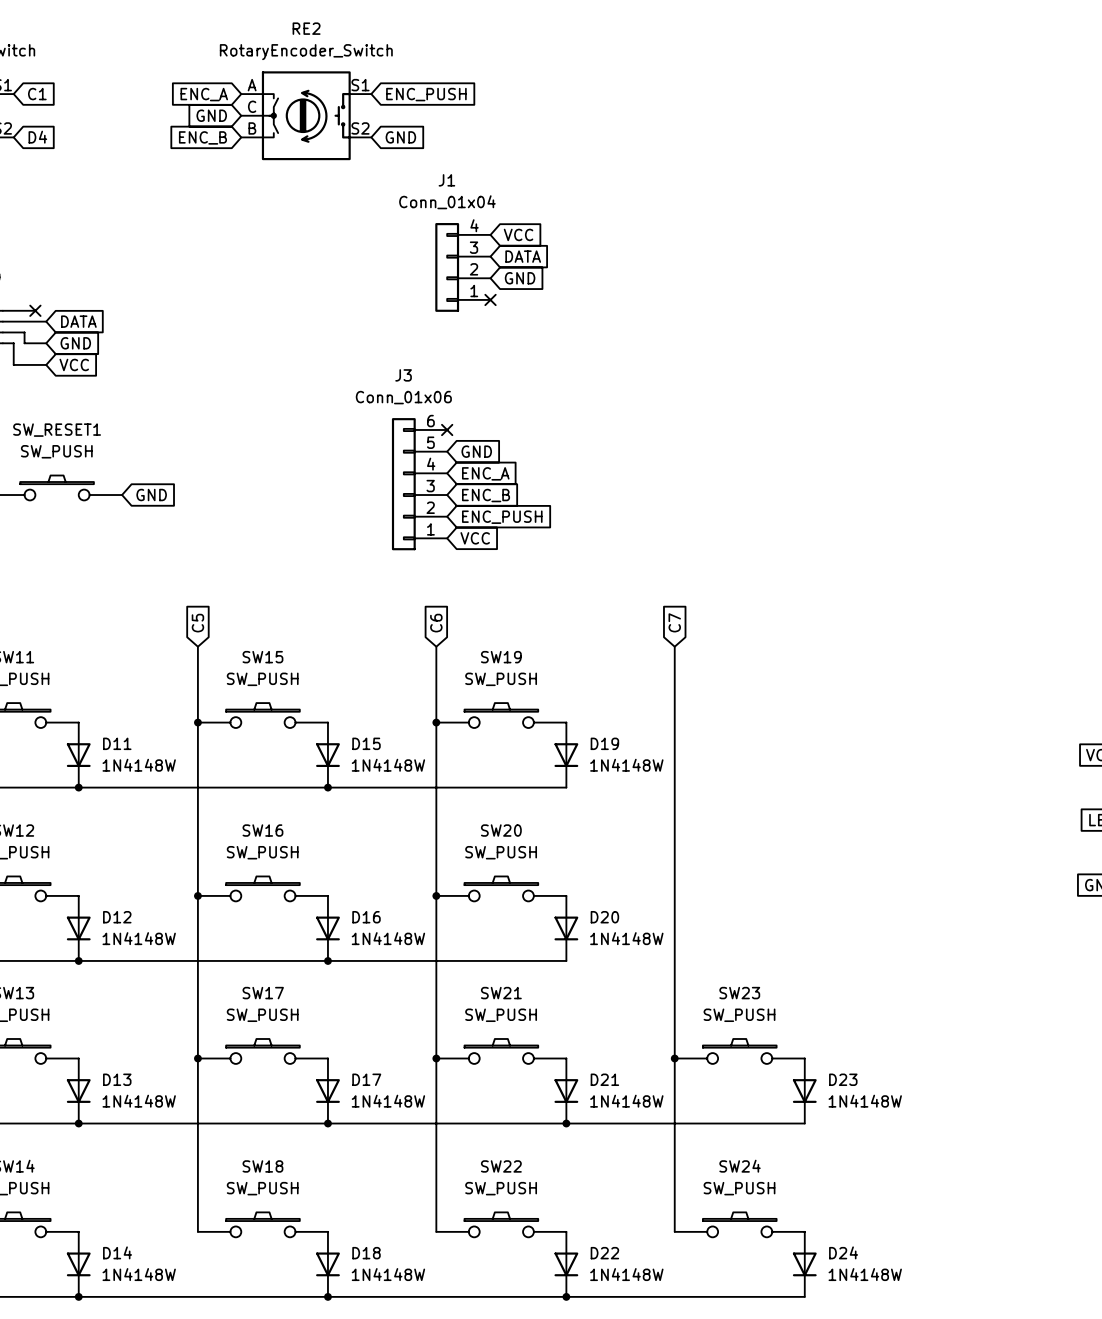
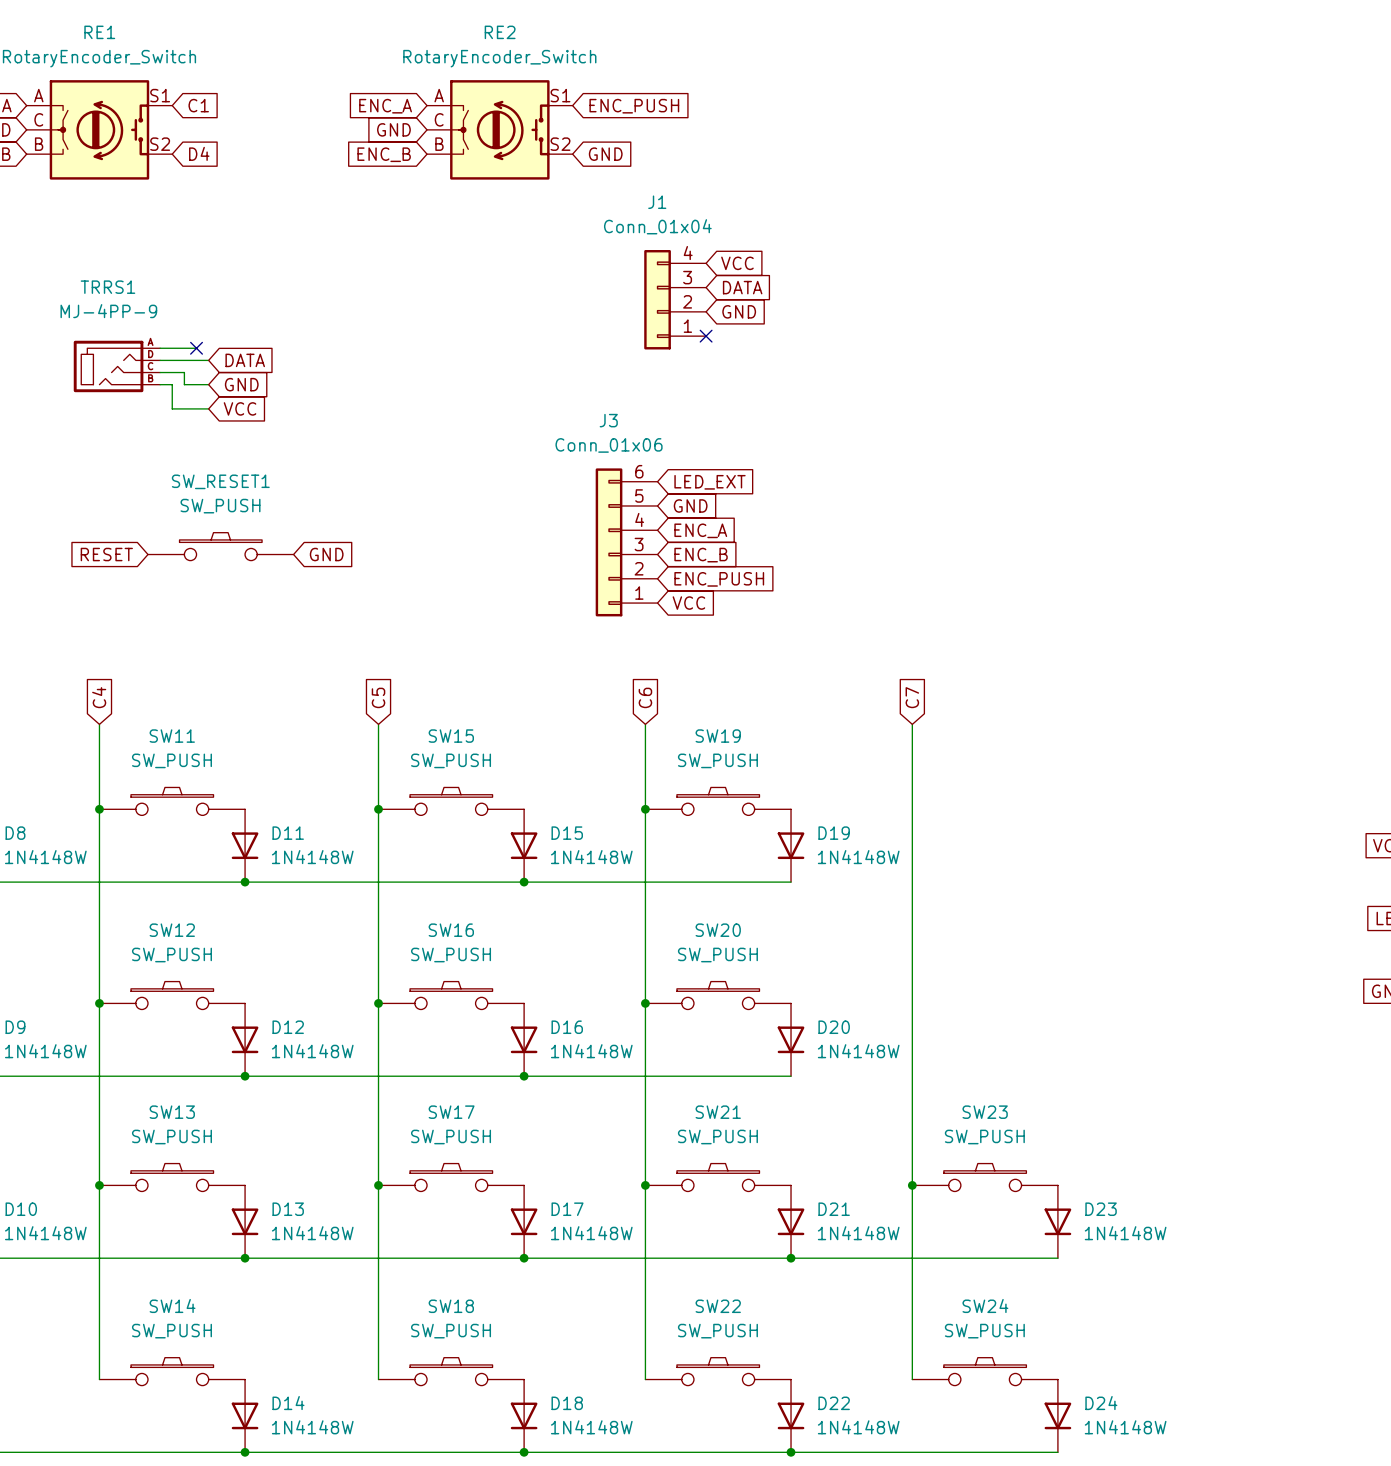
no-connect mark: (447, 429) -> none
global label: none -> LED_EXT (710, 482)

